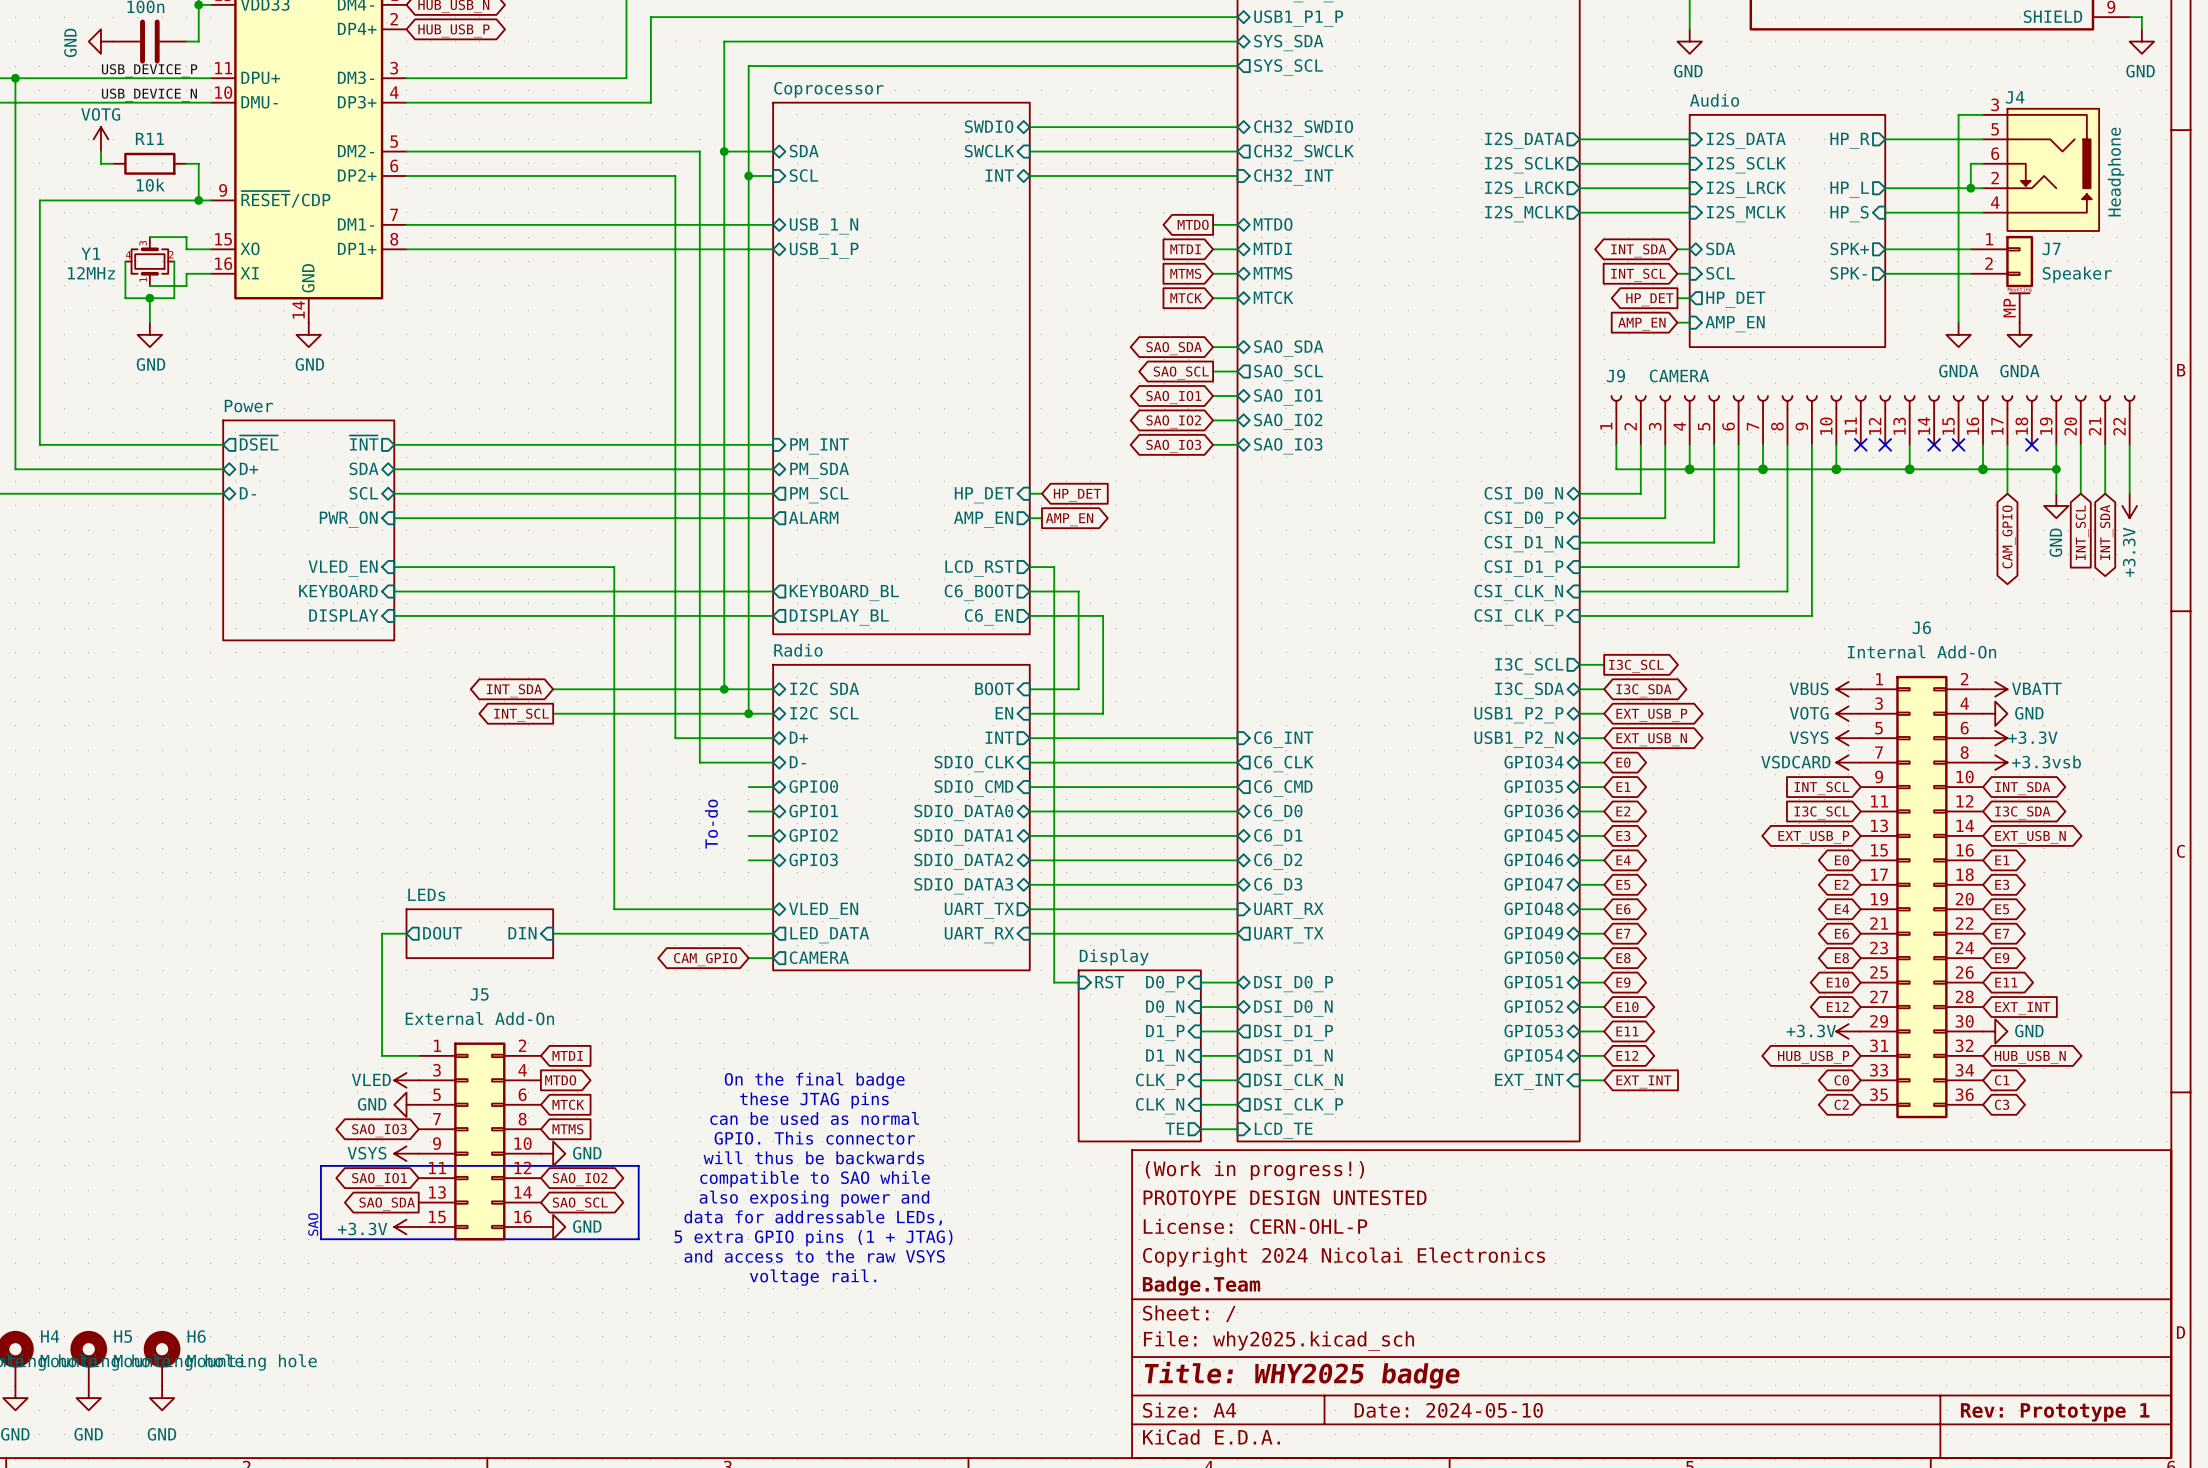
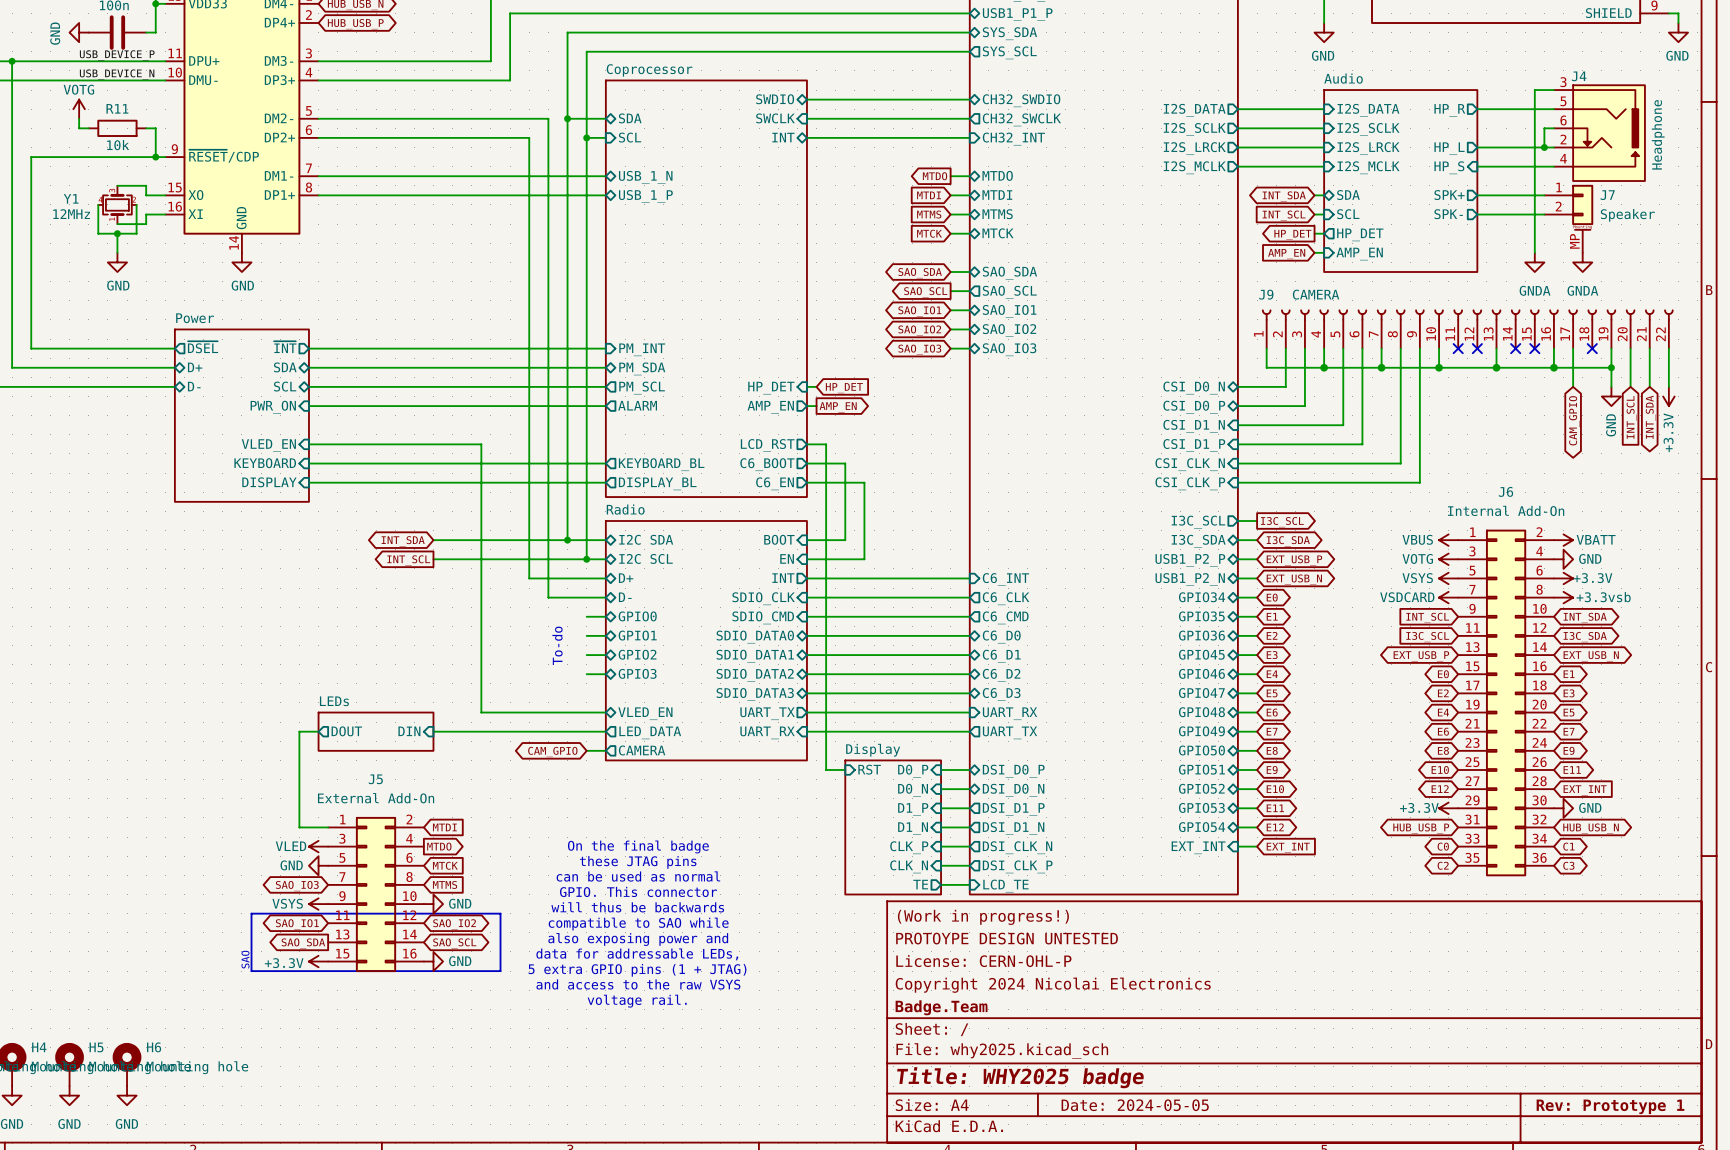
title block: Date: 2024-05-10 (1448, 1410) -> Date: 2024-05-05 (1135, 1105)

